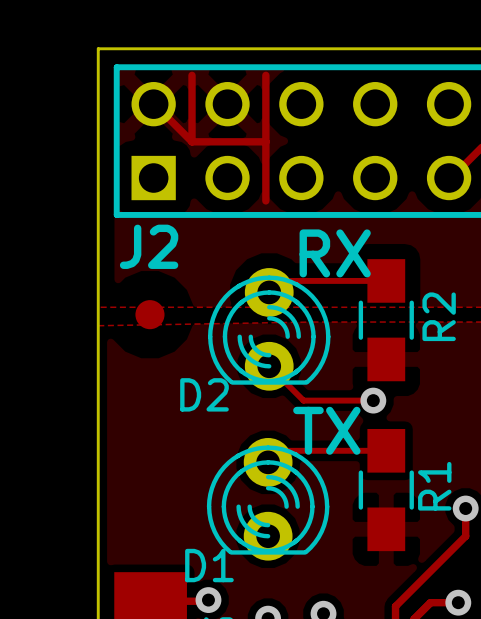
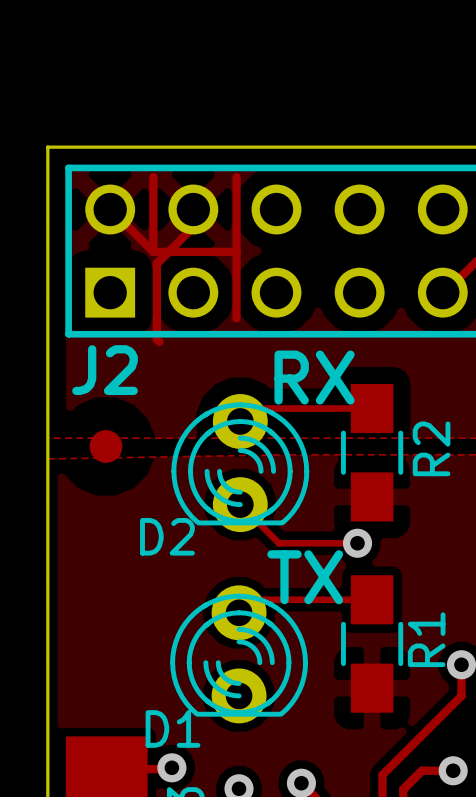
track: none -> (193, 209) (193, 227) (156, 263) (156, 339) (159, 341)

